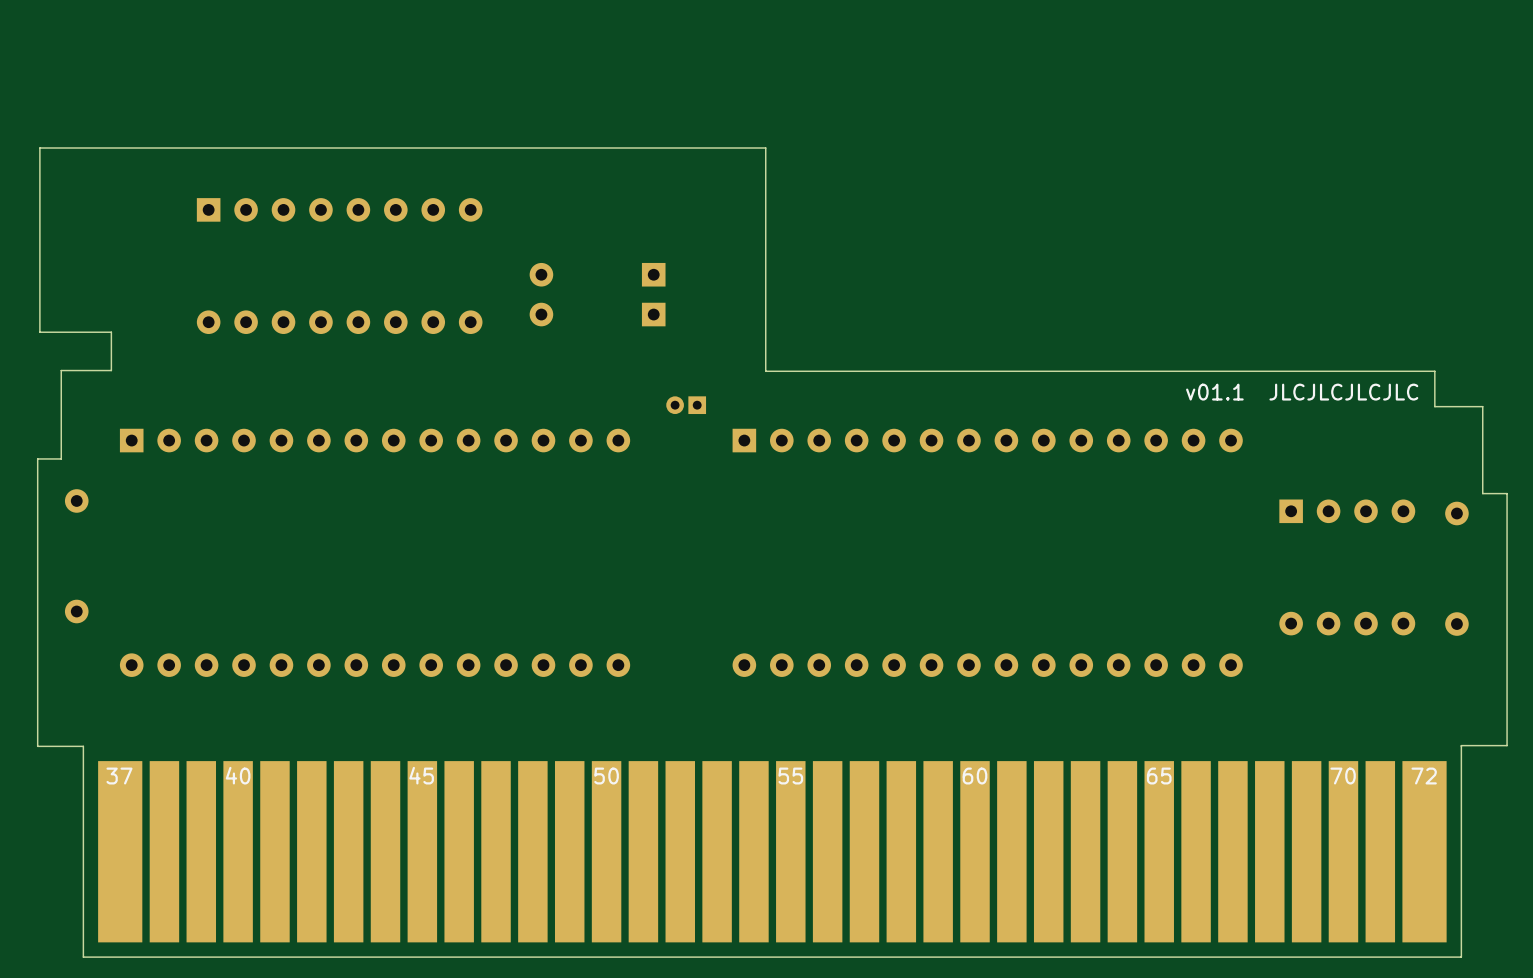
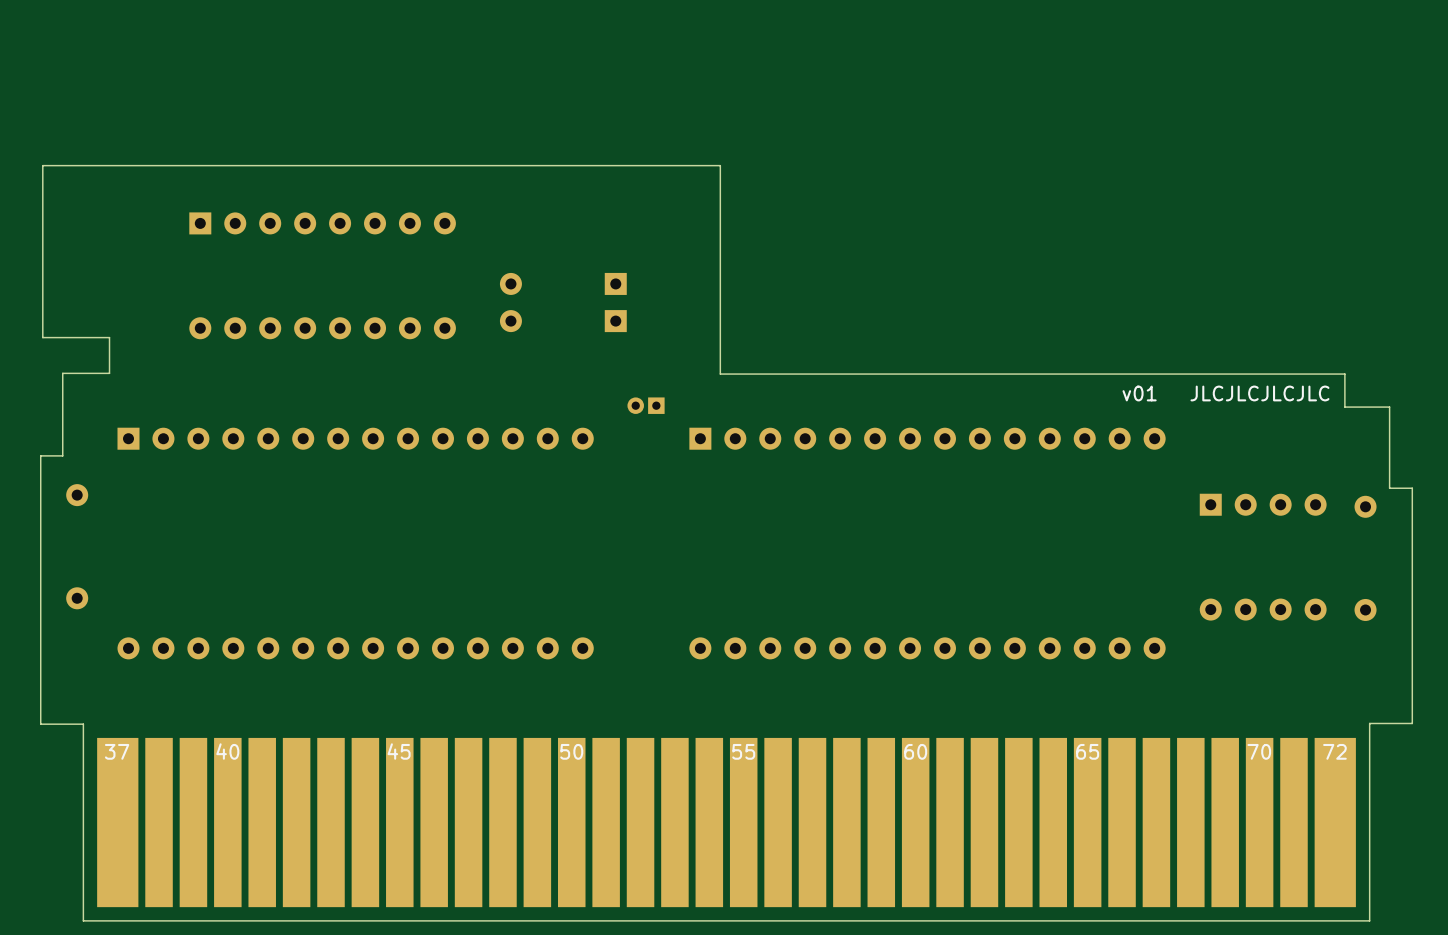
text: v01.1 (1214, 392) -> v01 (1139, 393)

